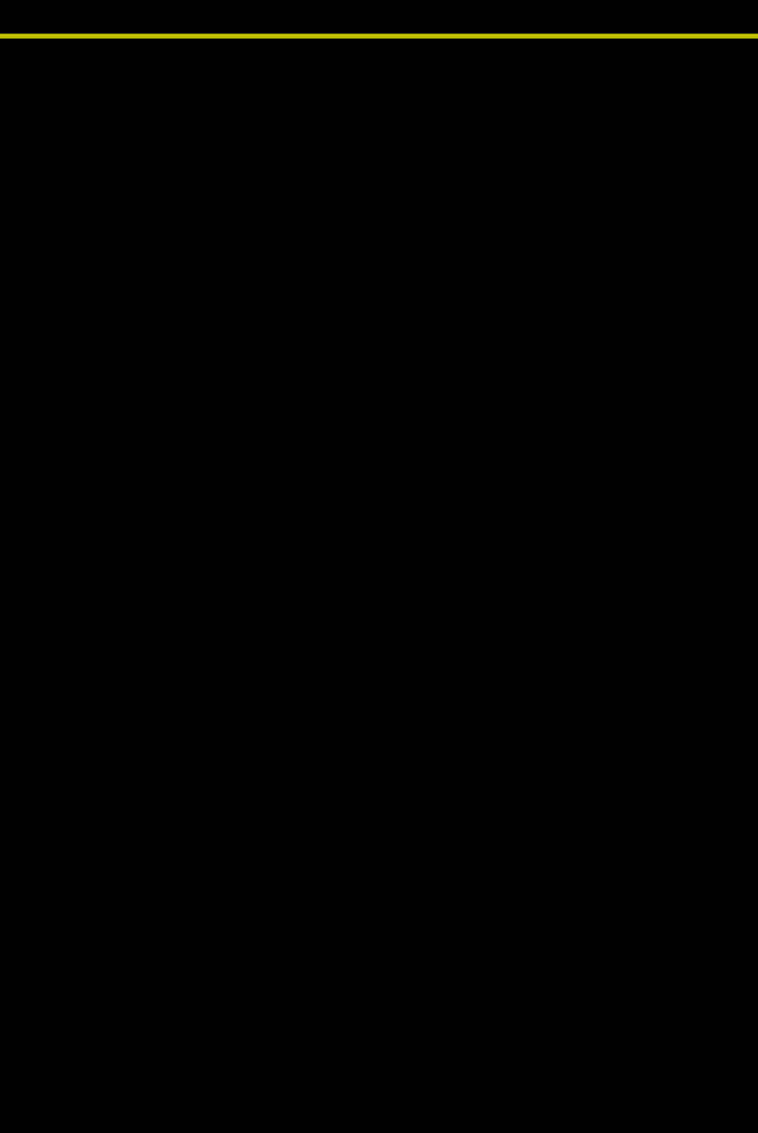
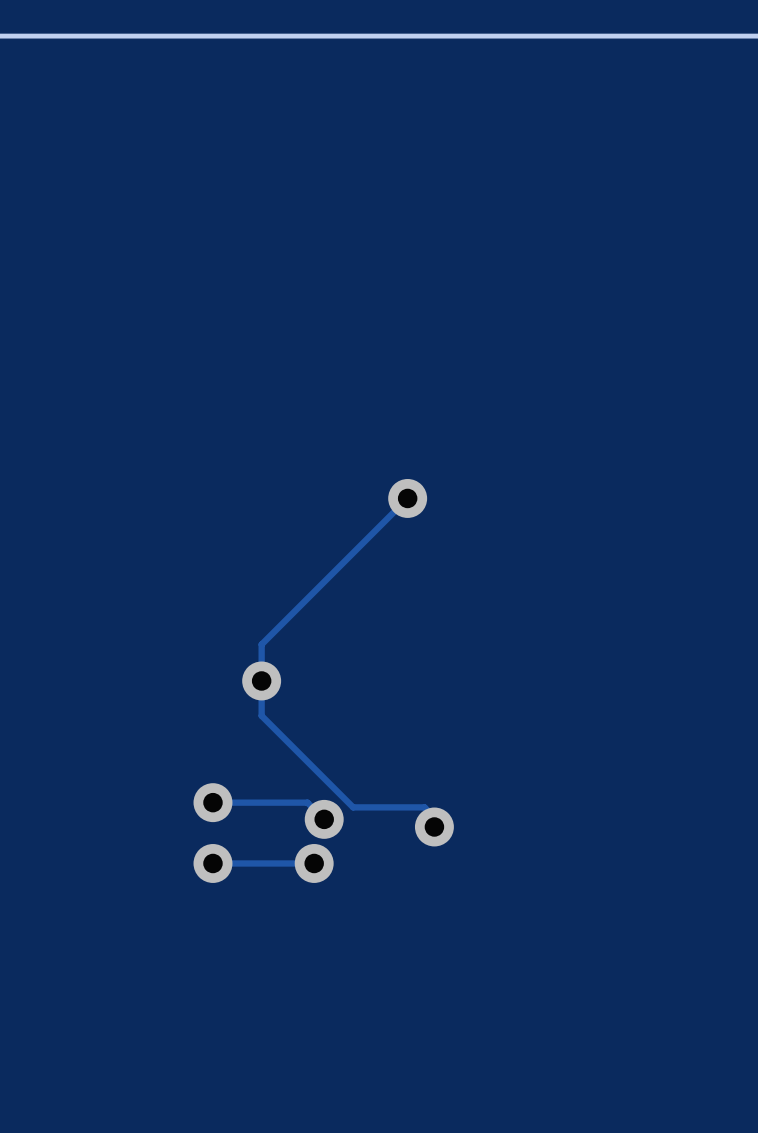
track: none -> (407, 498) (261, 644) (261, 715) (353, 807) (424, 807) (434, 817) (434, 826)
via: none -> (407, 498)
via: none -> (261, 680)
track: none -> (212, 802) (307, 802) (324, 819)
via: none -> (212, 802)
via: none -> (324, 819)
via: none -> (434, 826)
via: none -> (212, 863)
track: none -> (314, 863) (212, 863)
via: none -> (314, 863)

